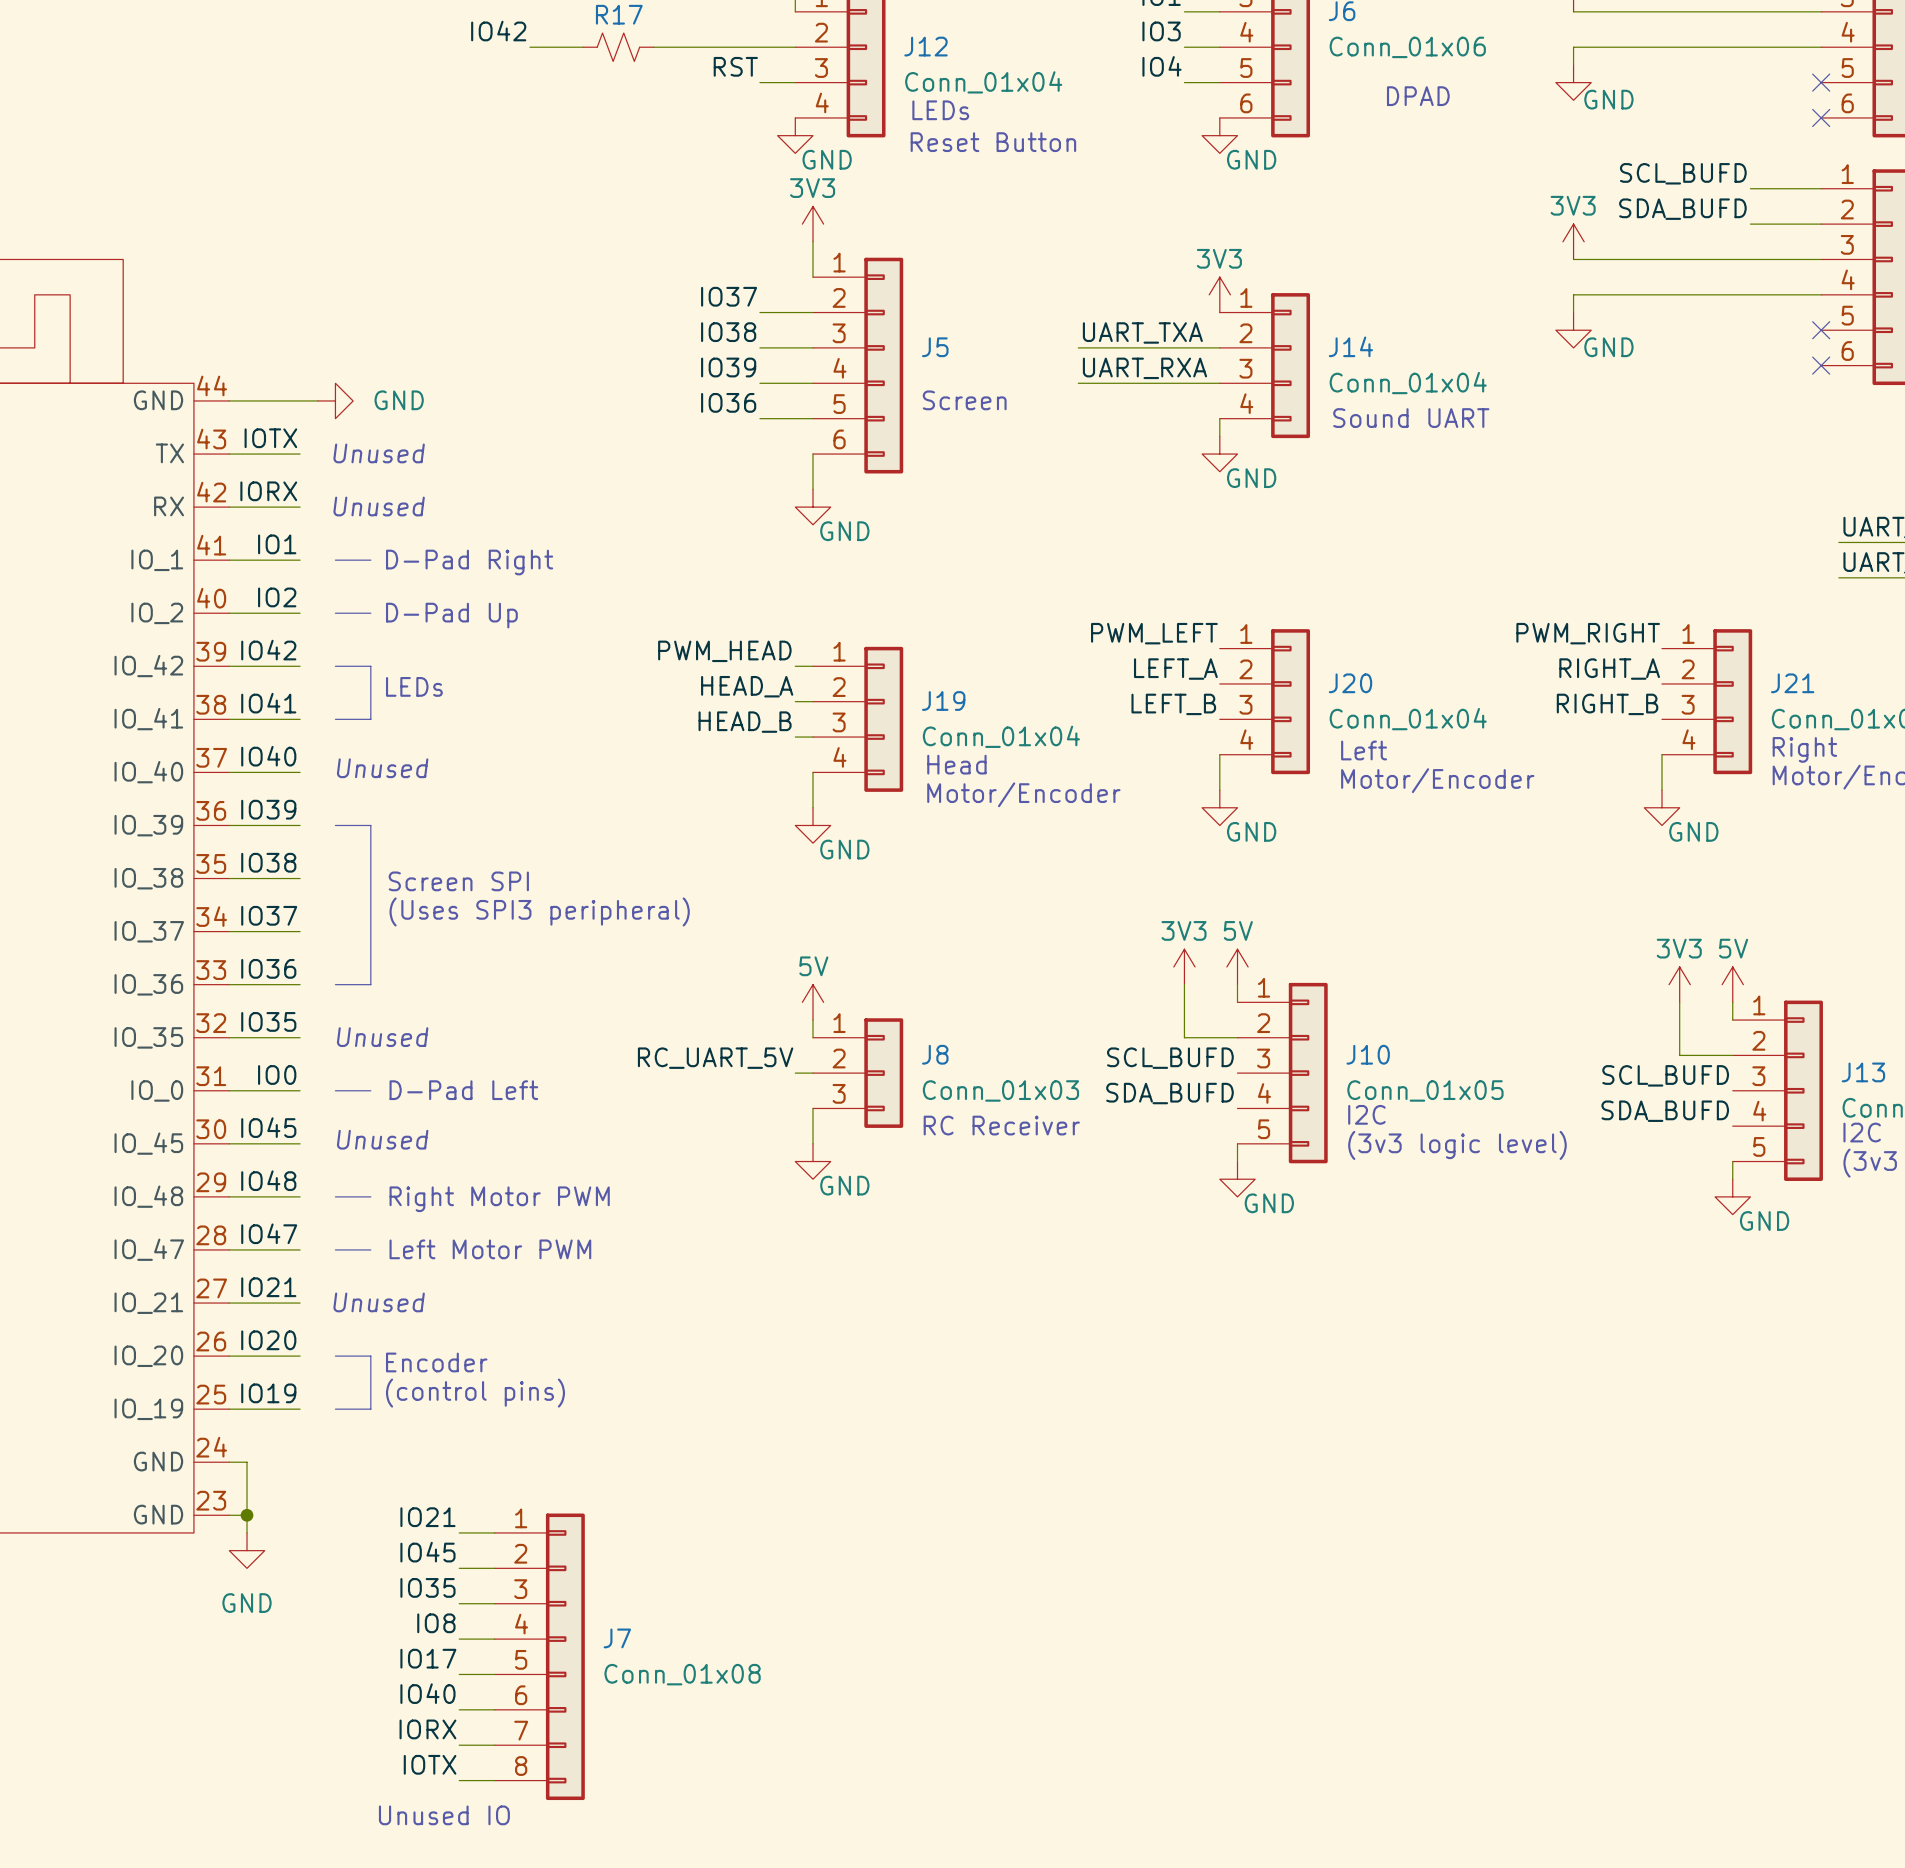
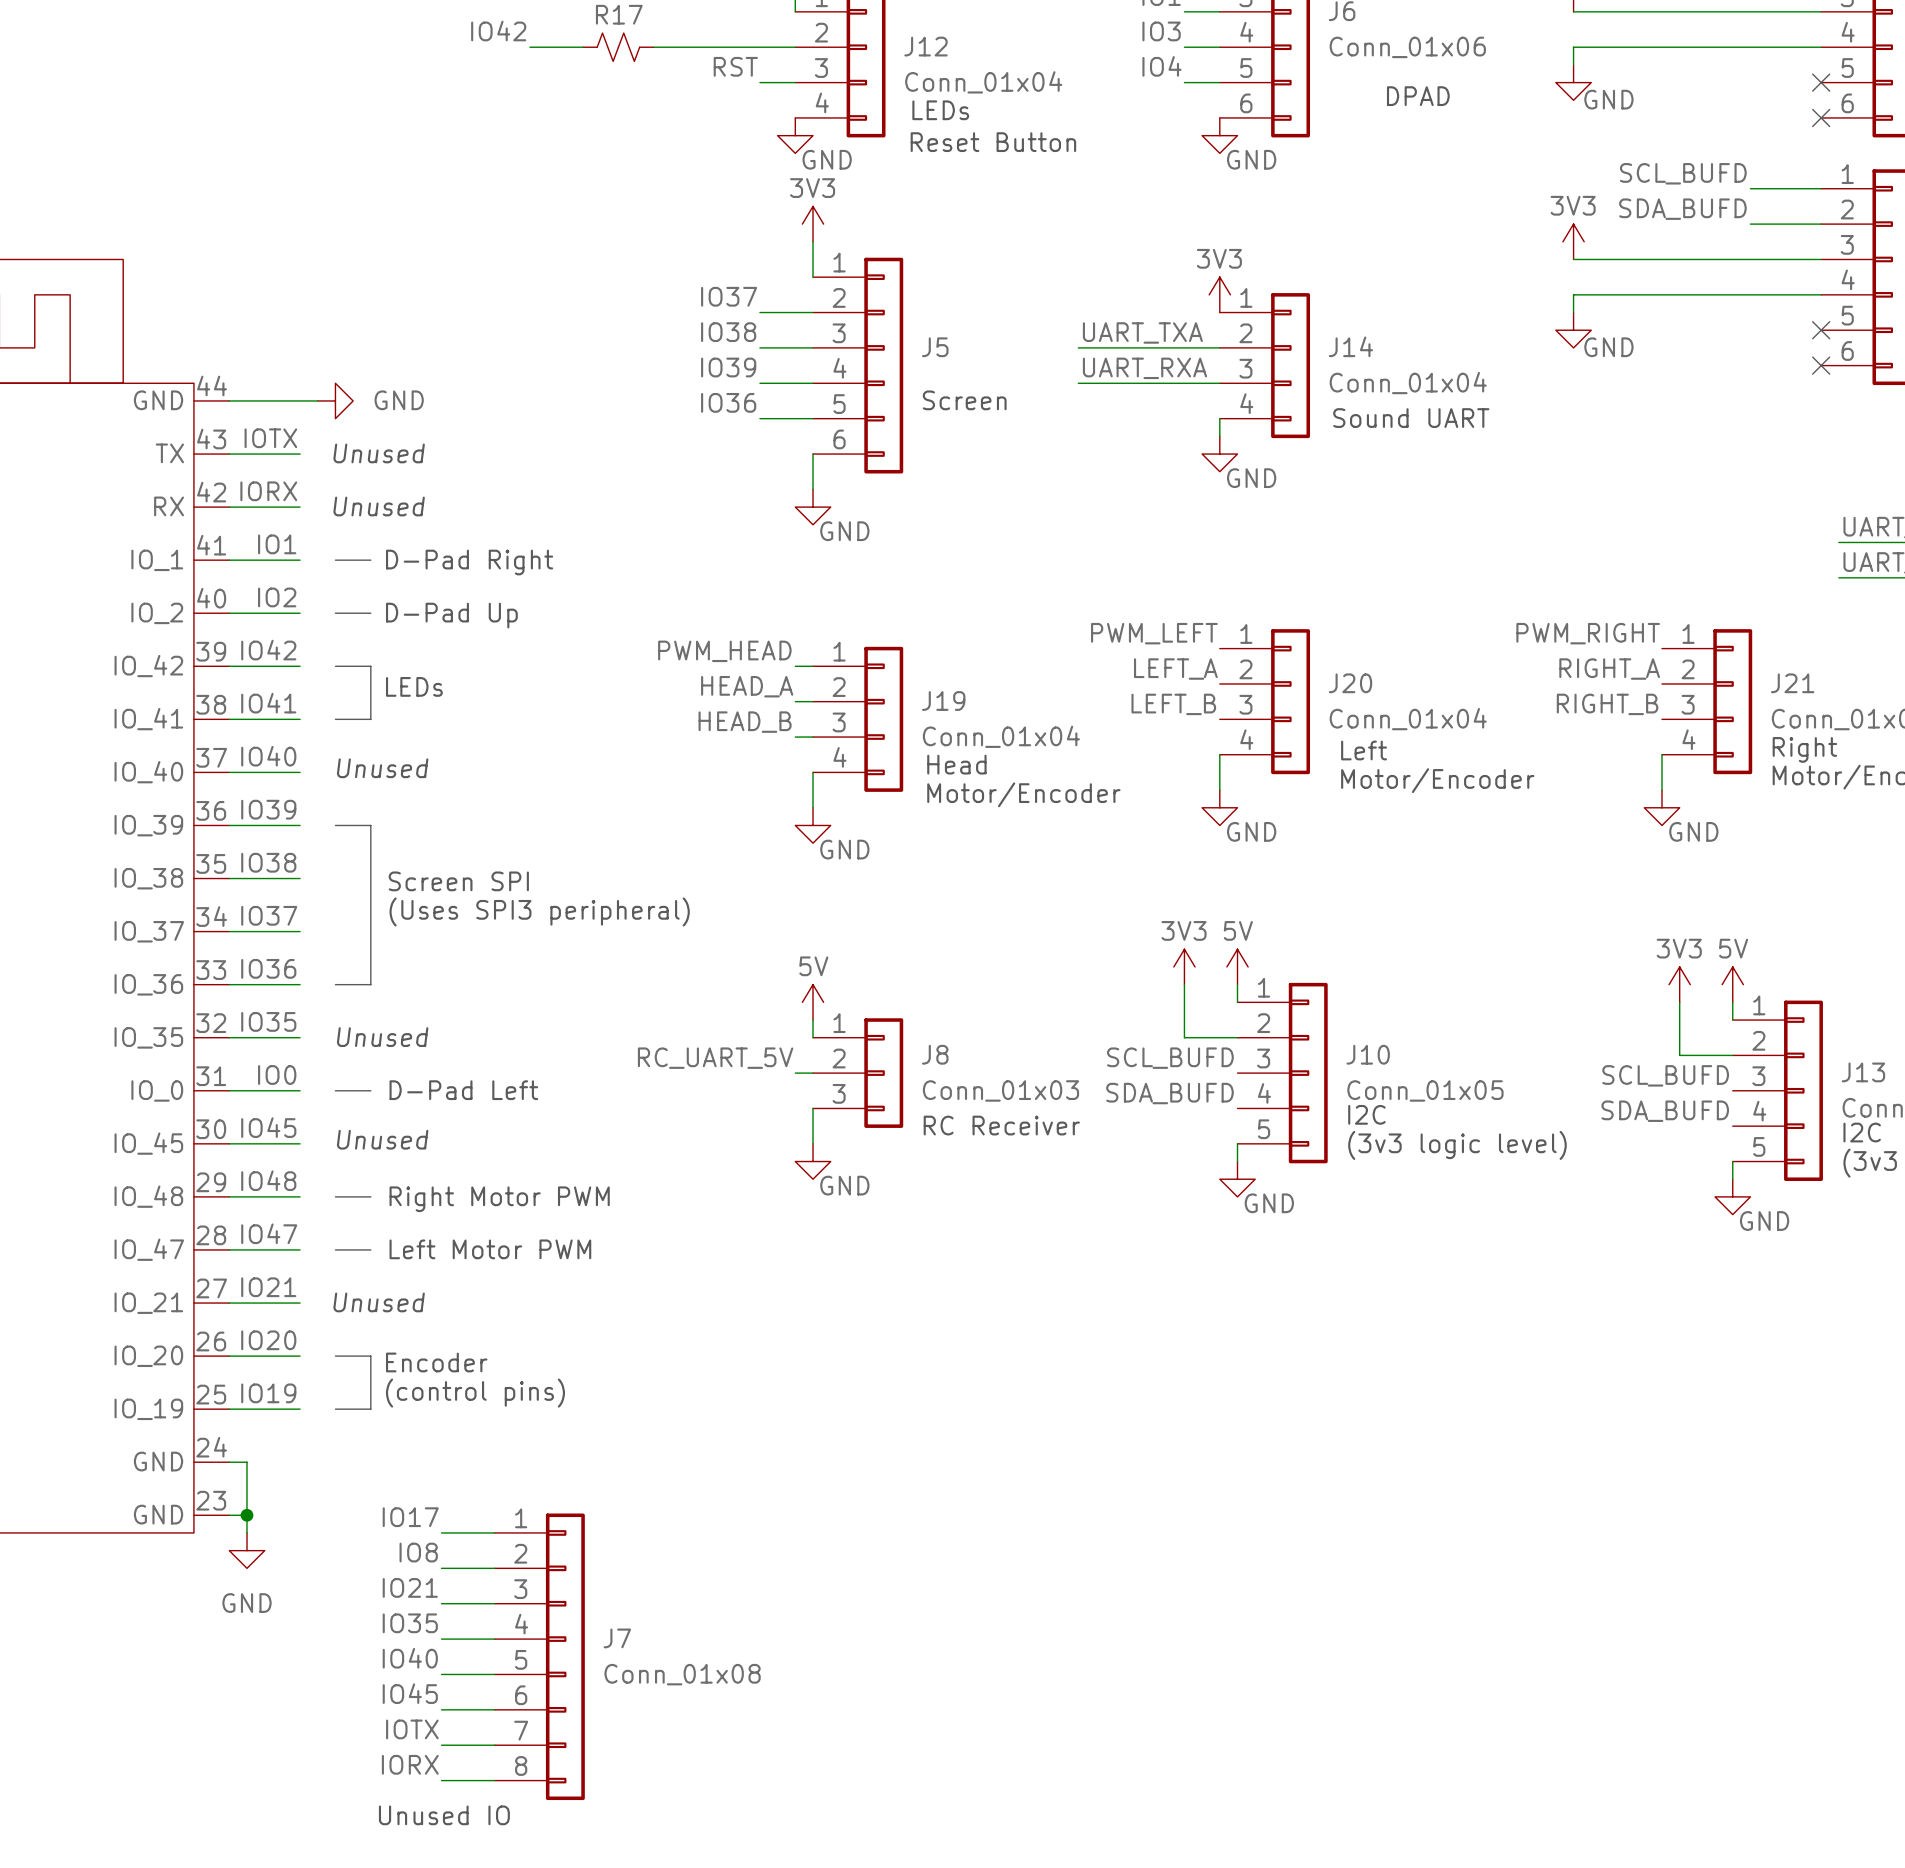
label position: IO21 (427, 1517) -> IO21 (410, 1587)
wire: none -> (441, 1532) (459, 1532)
label position: IO45 (427, 1552) -> IO45 (410, 1693)
wire: none -> (441, 1568) (459, 1568)
label position: IO35 (427, 1587) -> IO35 (410, 1623)
wire: none -> (441, 1603) (459, 1603)
label position: IO8 (436, 1623) -> IO8 (418, 1552)
wire: none -> (441, 1639) (459, 1639)
label position: IO17 (428, 1658) -> IO17 (410, 1517)
wire: none -> (441, 1674) (459, 1674)
label position: IO40 (427, 1693) -> IO40 (410, 1658)
wire: none -> (441, 1709) (459, 1709)
label position: IORX (427, 1729) -> IORX (410, 1764)
wire: none -> (441, 1745) (459, 1745)
label position: IOTX (430, 1764) -> IOTX (412, 1729)
wire: none -> (441, 1780) (459, 1780)

